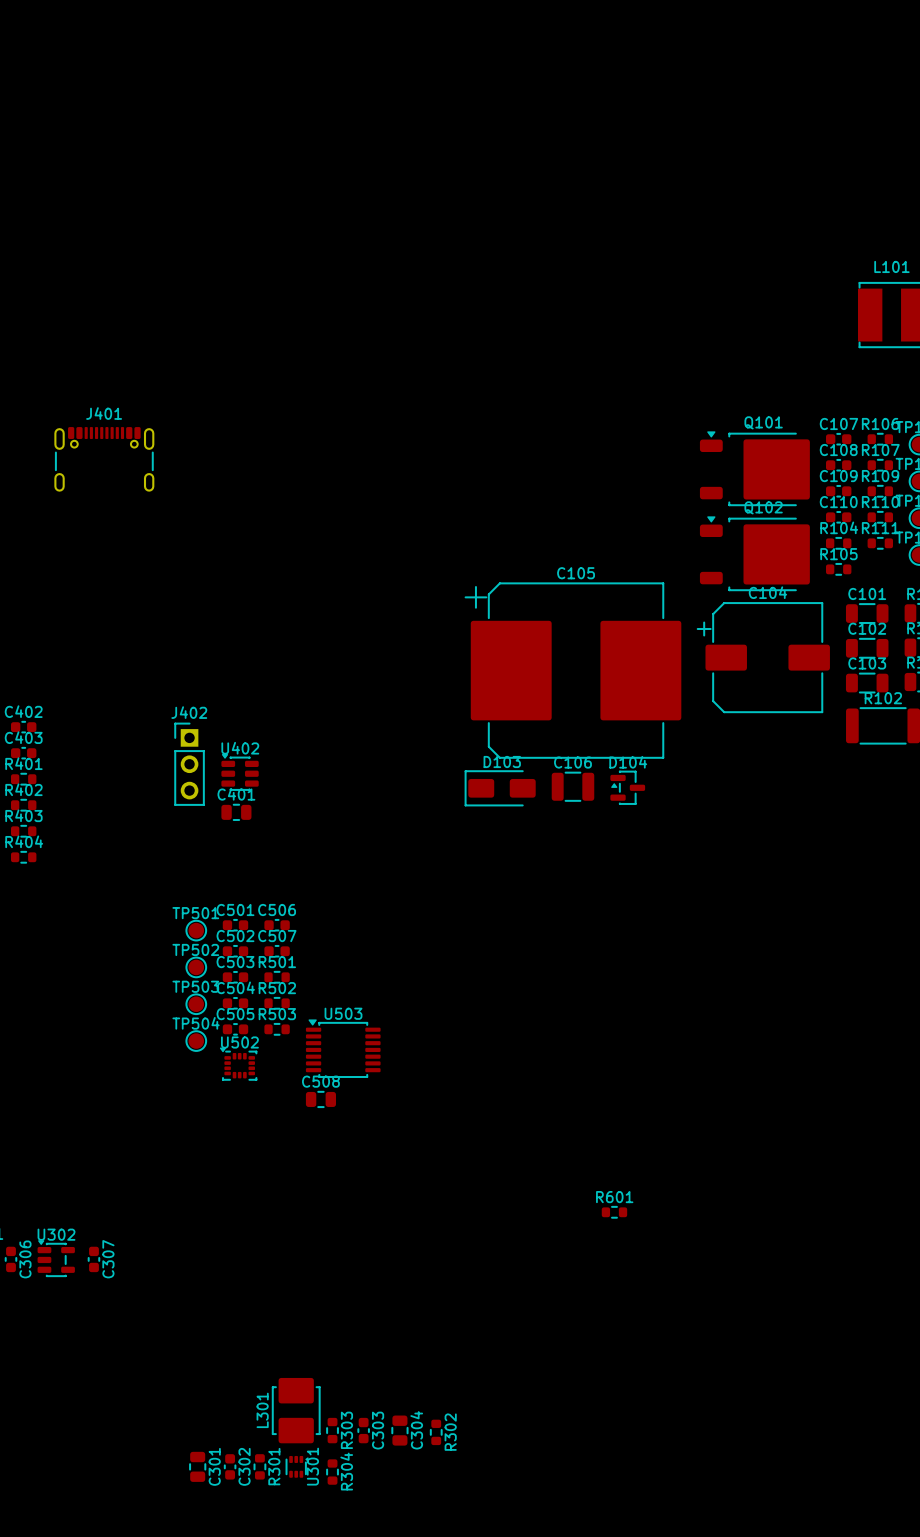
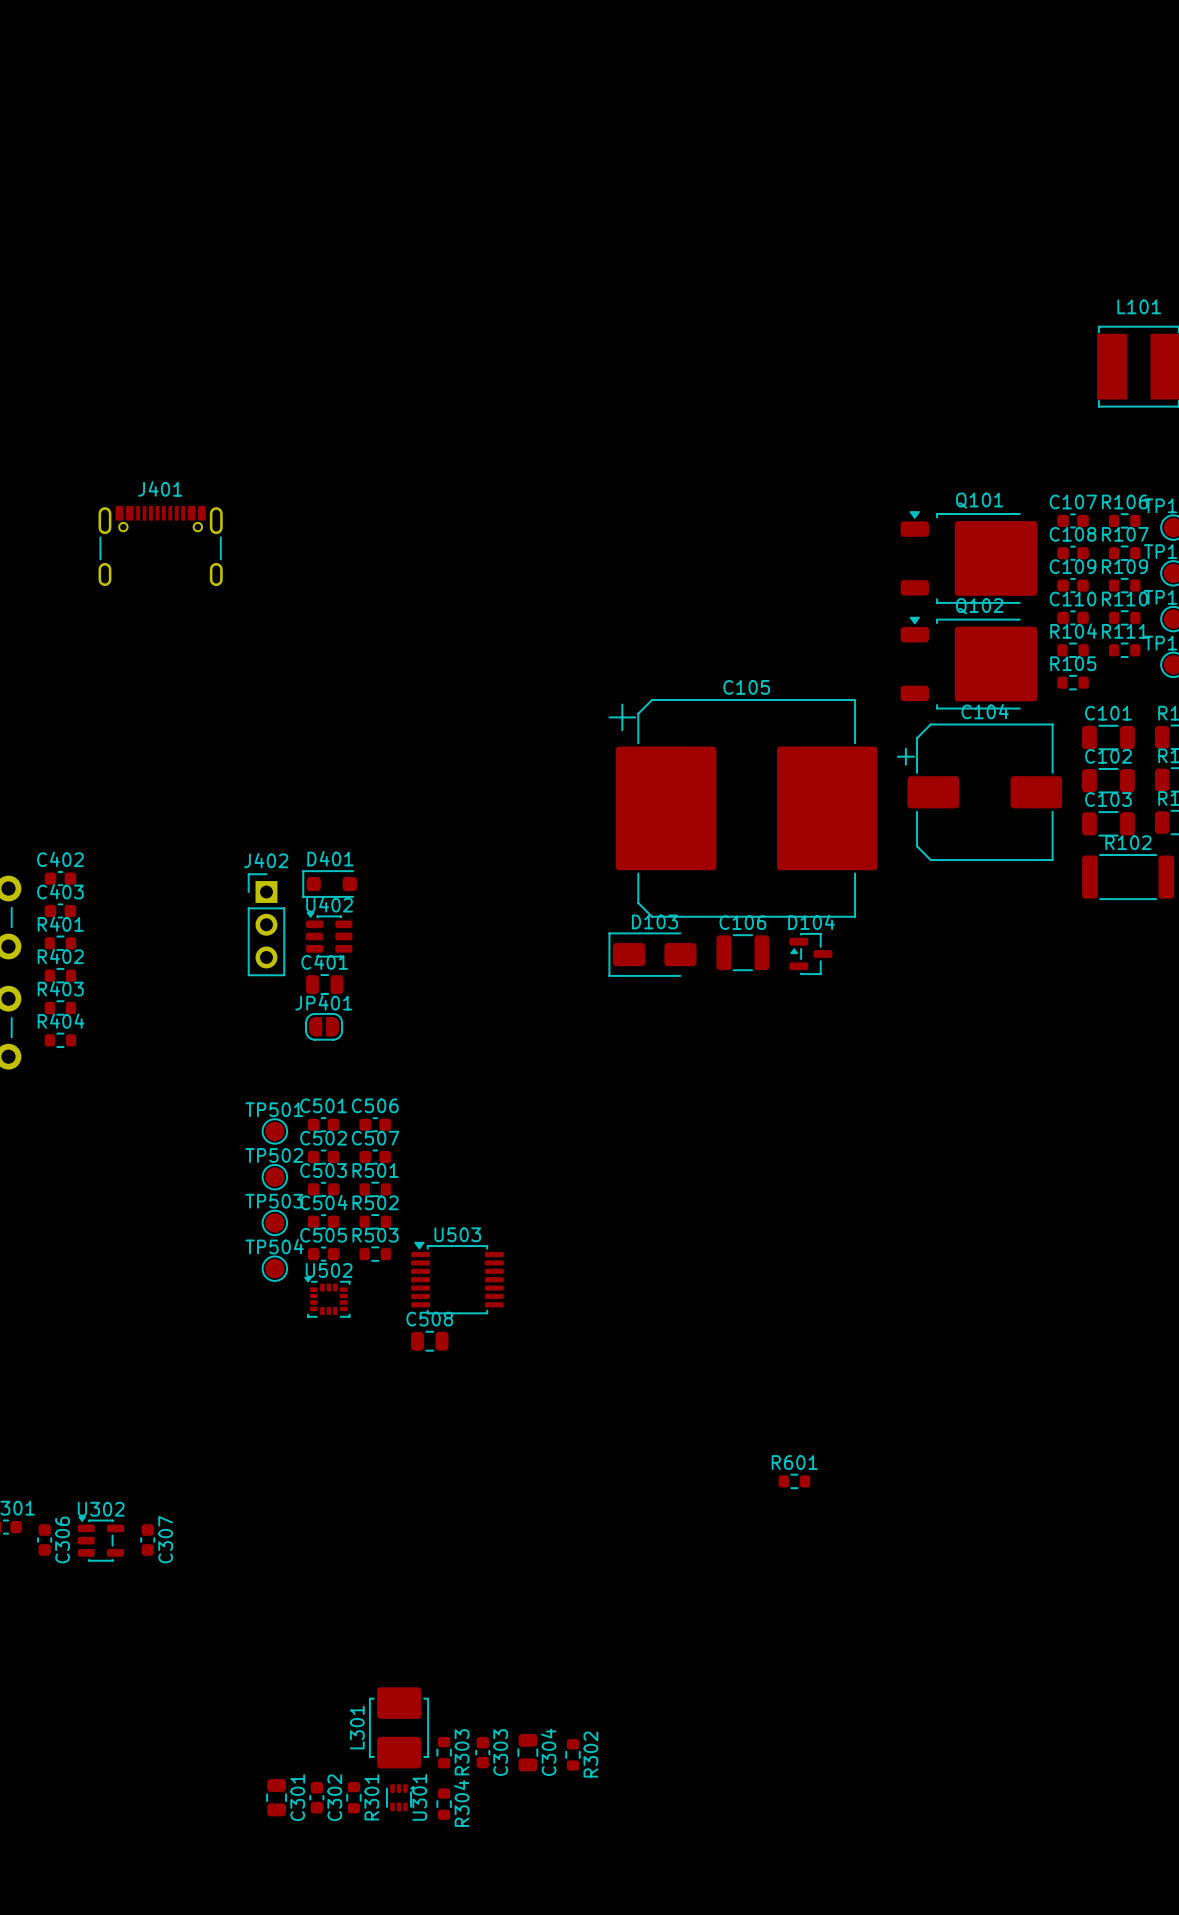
D401: none -> (329, 884)
JP401: none -> (324, 1026)

